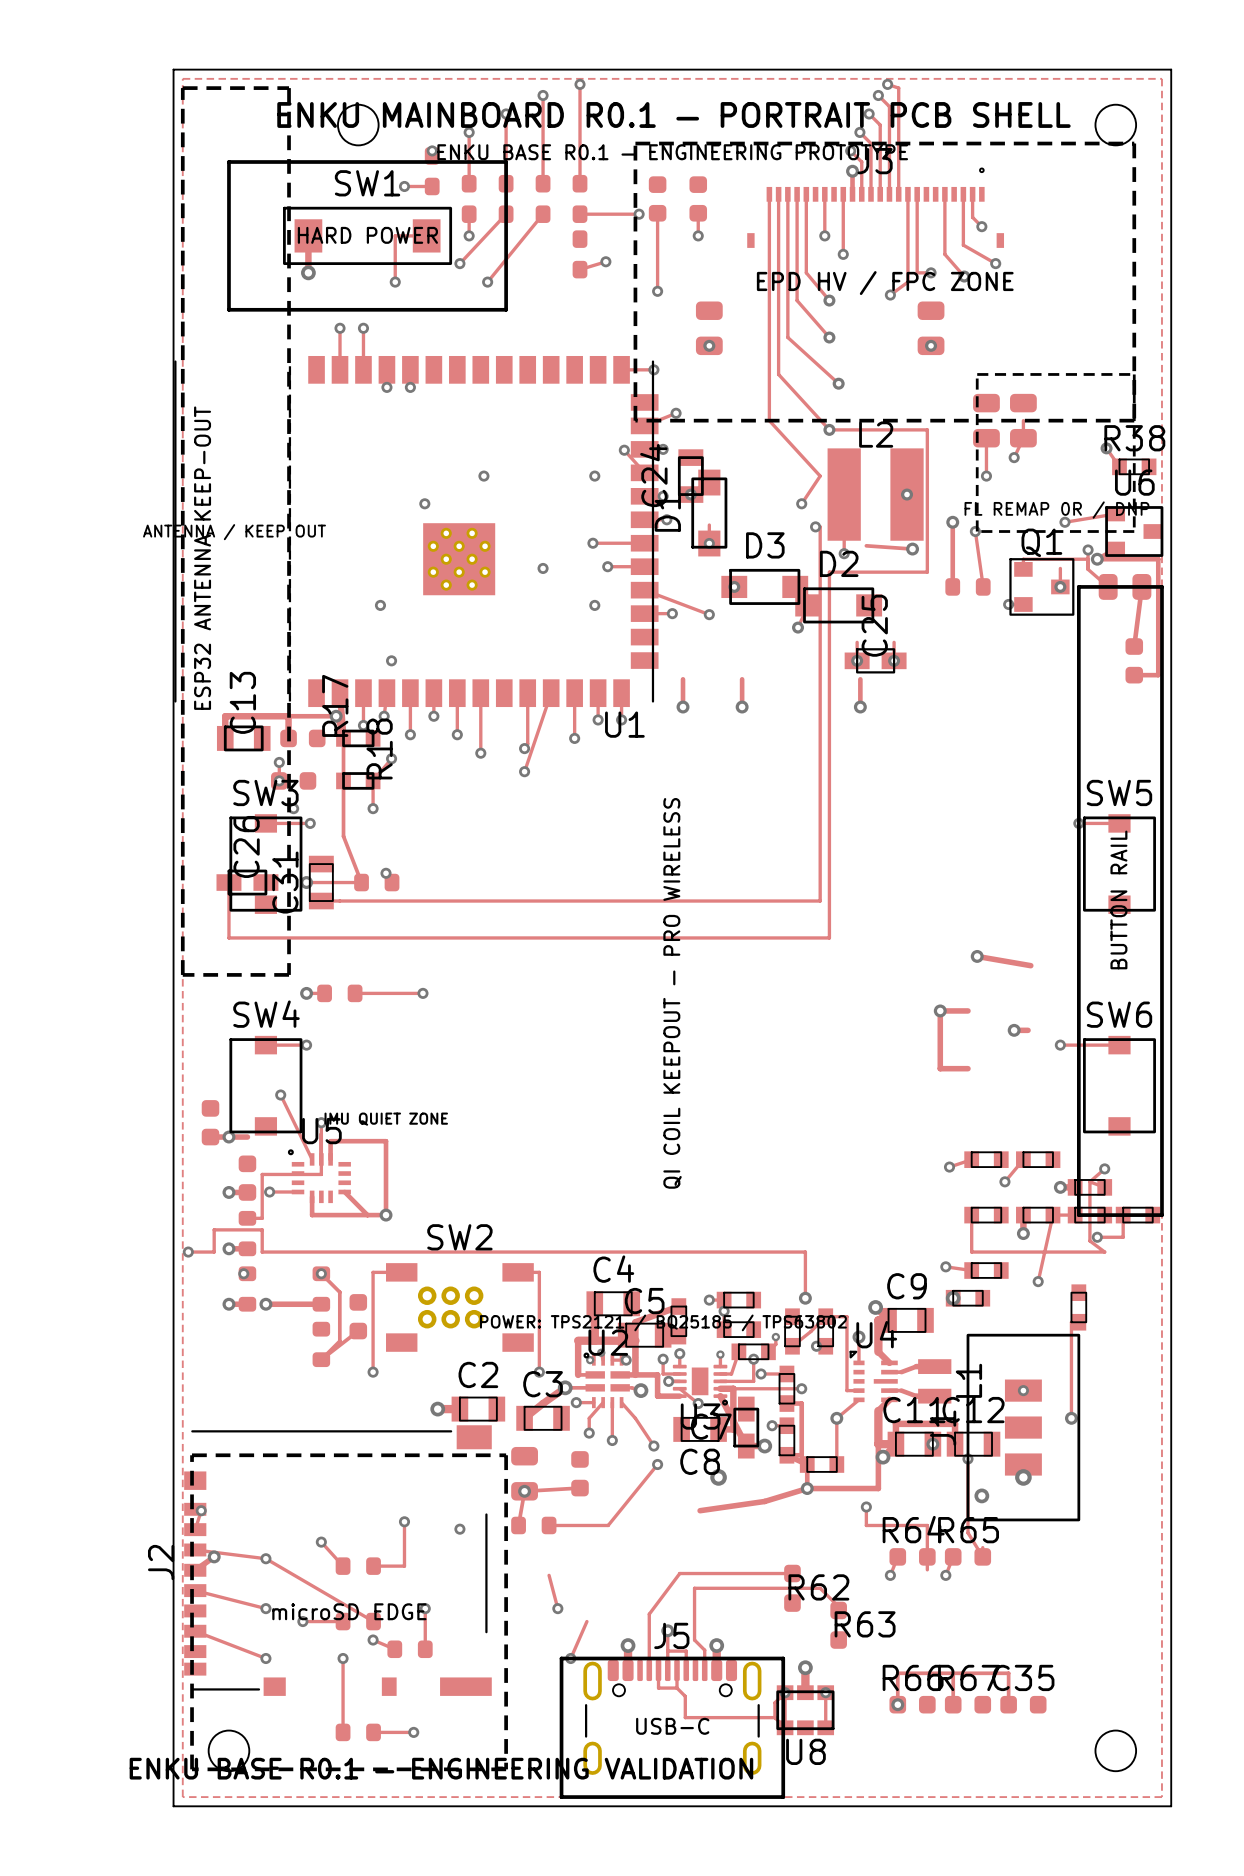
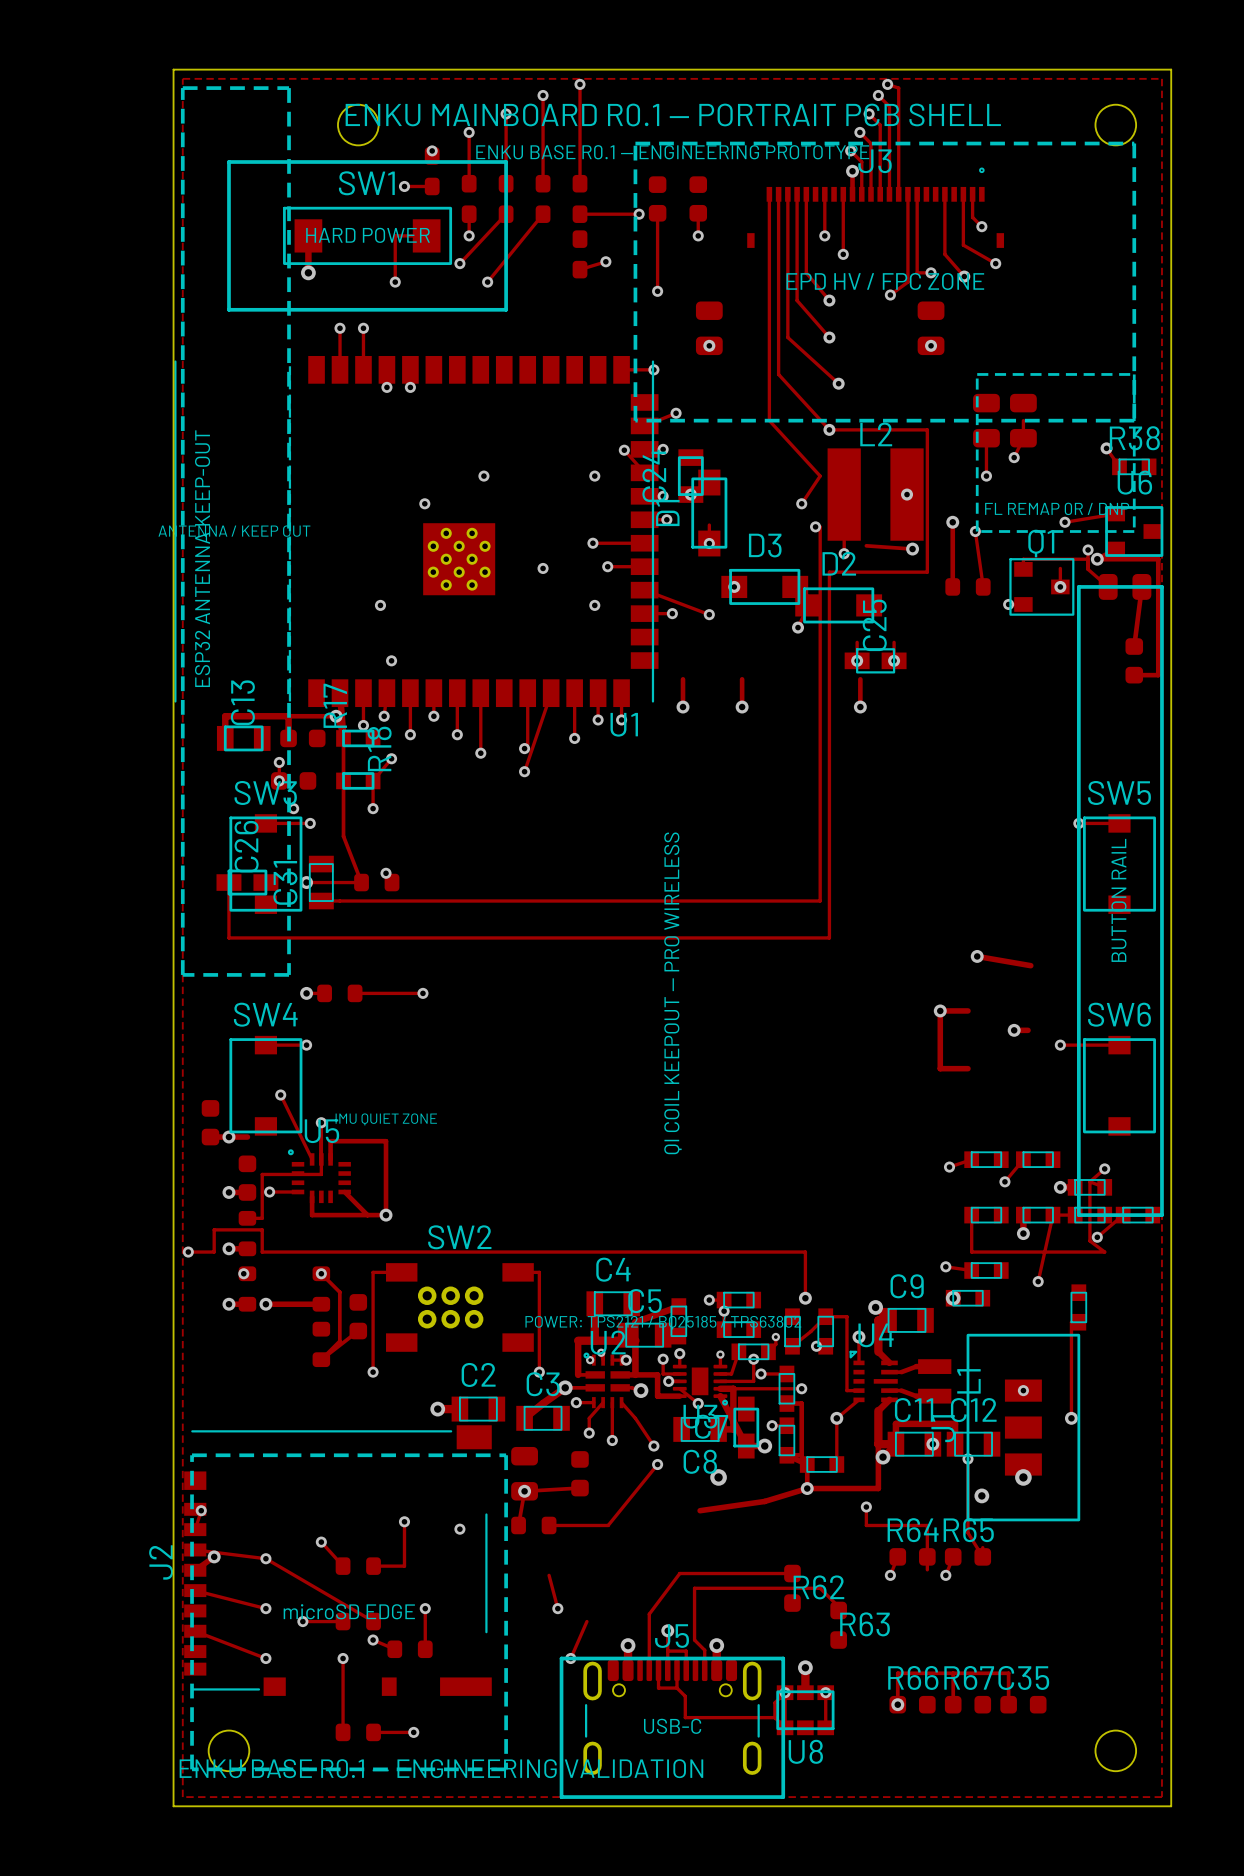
track: (1123, 1215) (1123, 1237) (1097, 1237) -> (1123, 1215) (1097, 1237)

